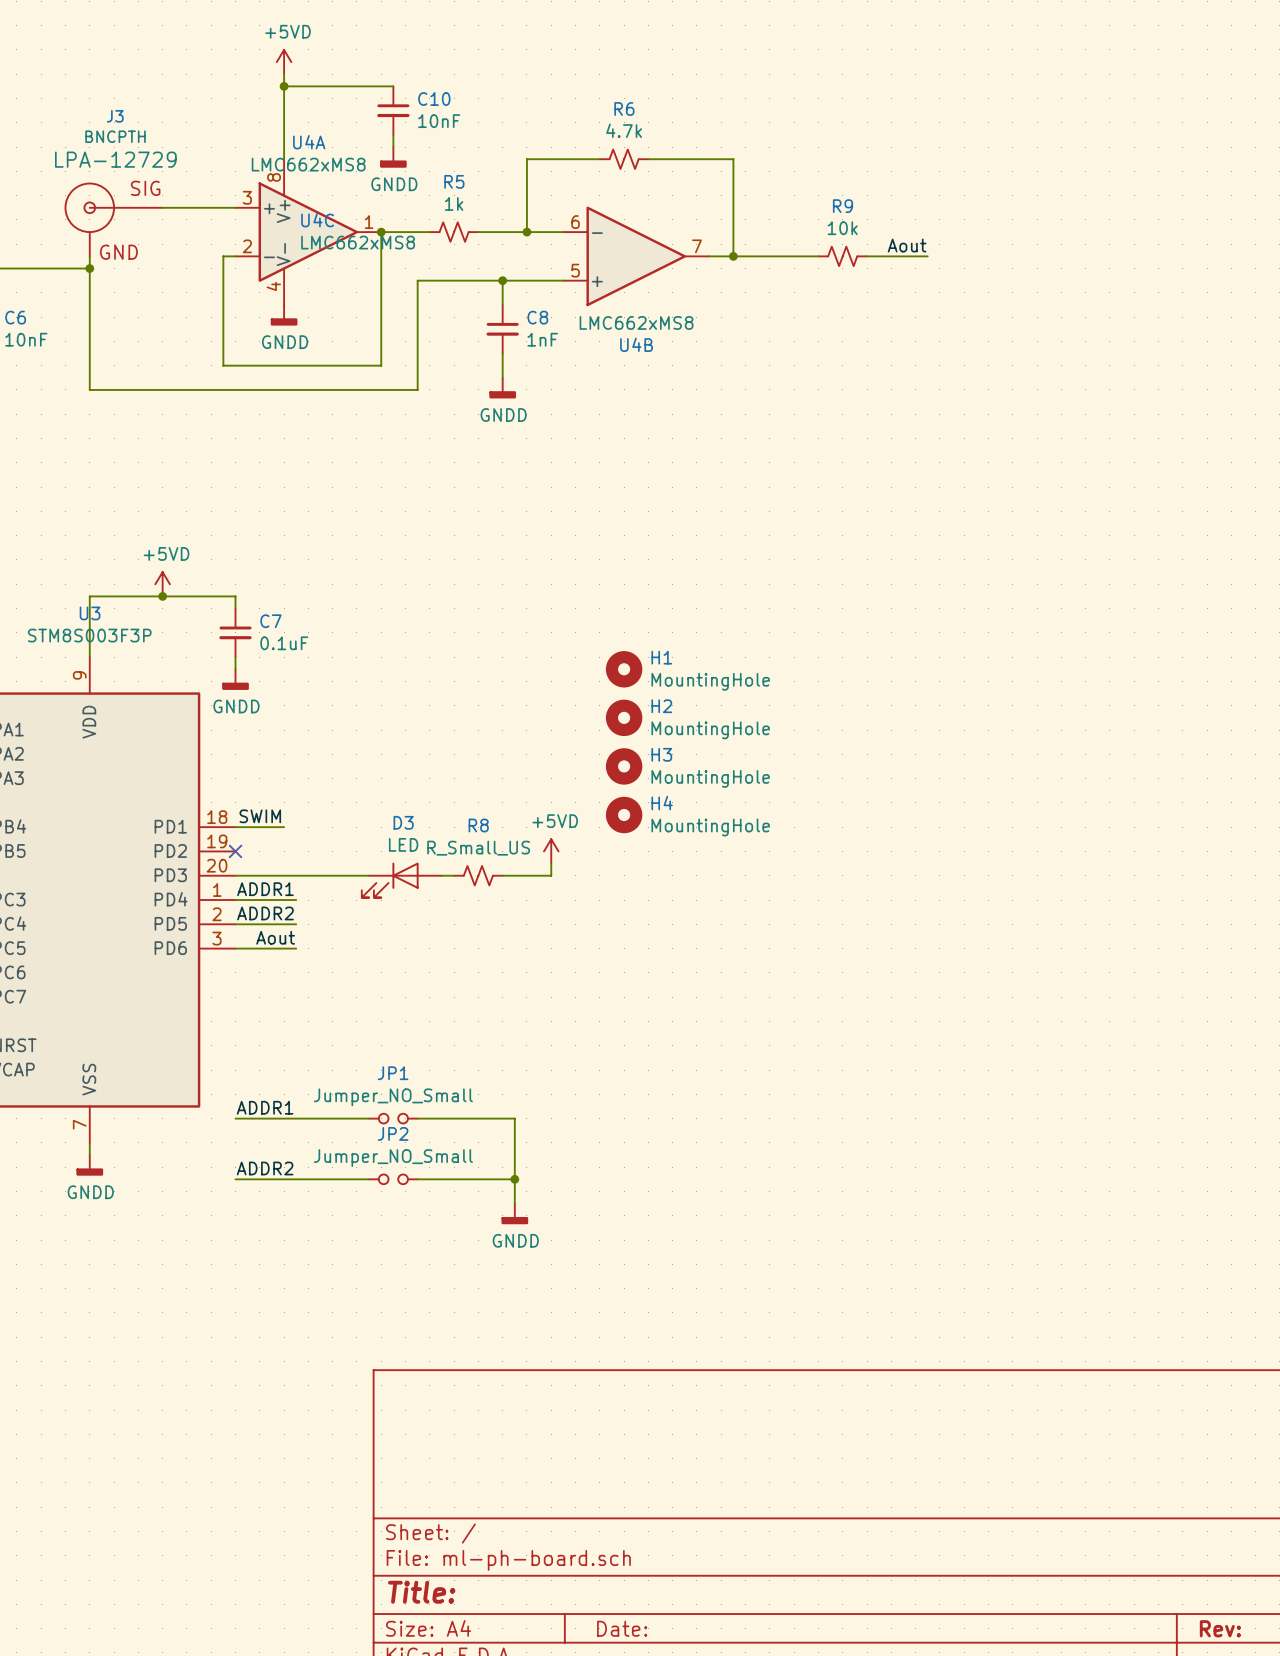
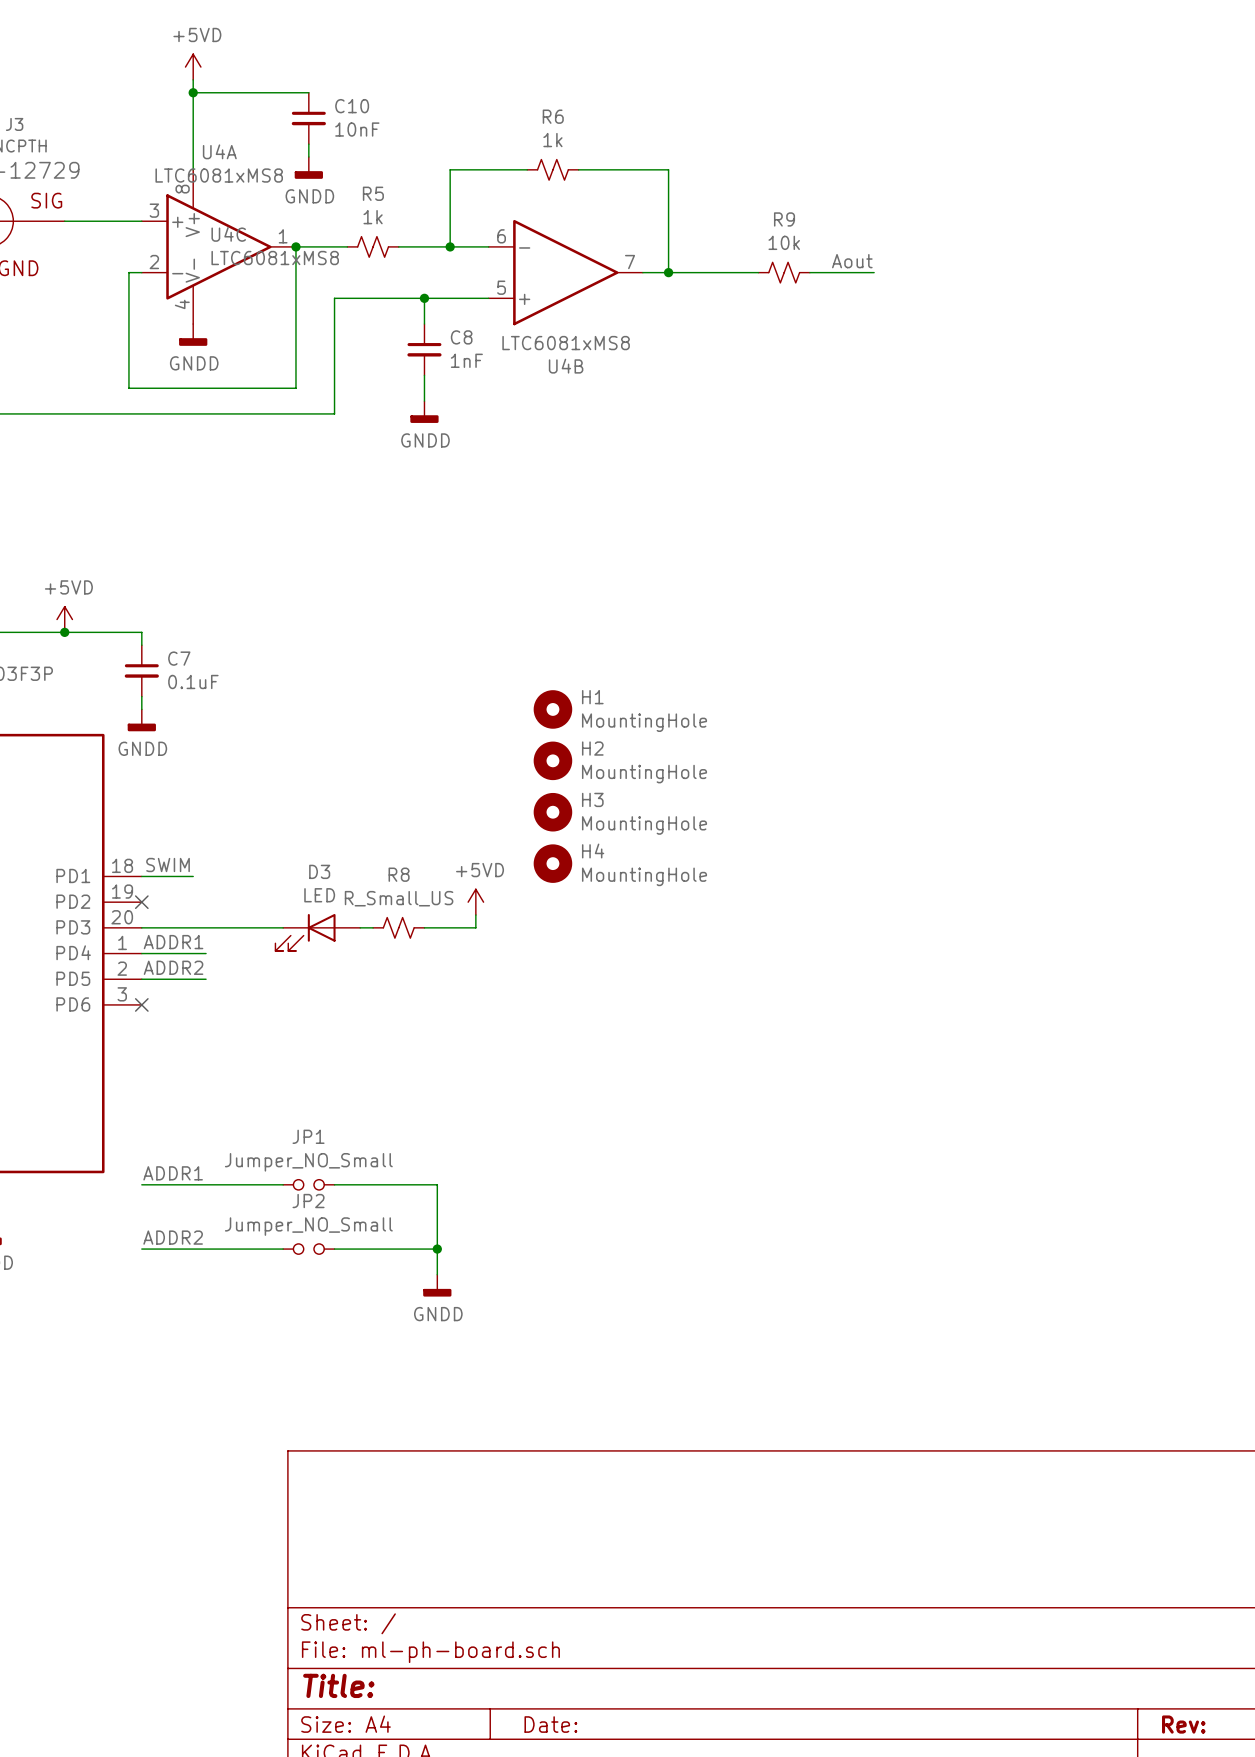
R6 value: 4.7k (624, 130) -> 1k (552, 140)
U4A value: LMC662xMS8 (308, 164) -> LTC6081xMS8 (219, 175)
U4C value: LMC662xMS8 (358, 242) -> LTC6081xMS8 (275, 258)
U4B value: LMC662xMS8 (636, 322) -> LTC6081xMS8 (566, 343)
label: Aout (275, 937) -> none
wire: (235, 948) (296, 948) -> none
no-connect mark: none -> (141, 1004)

